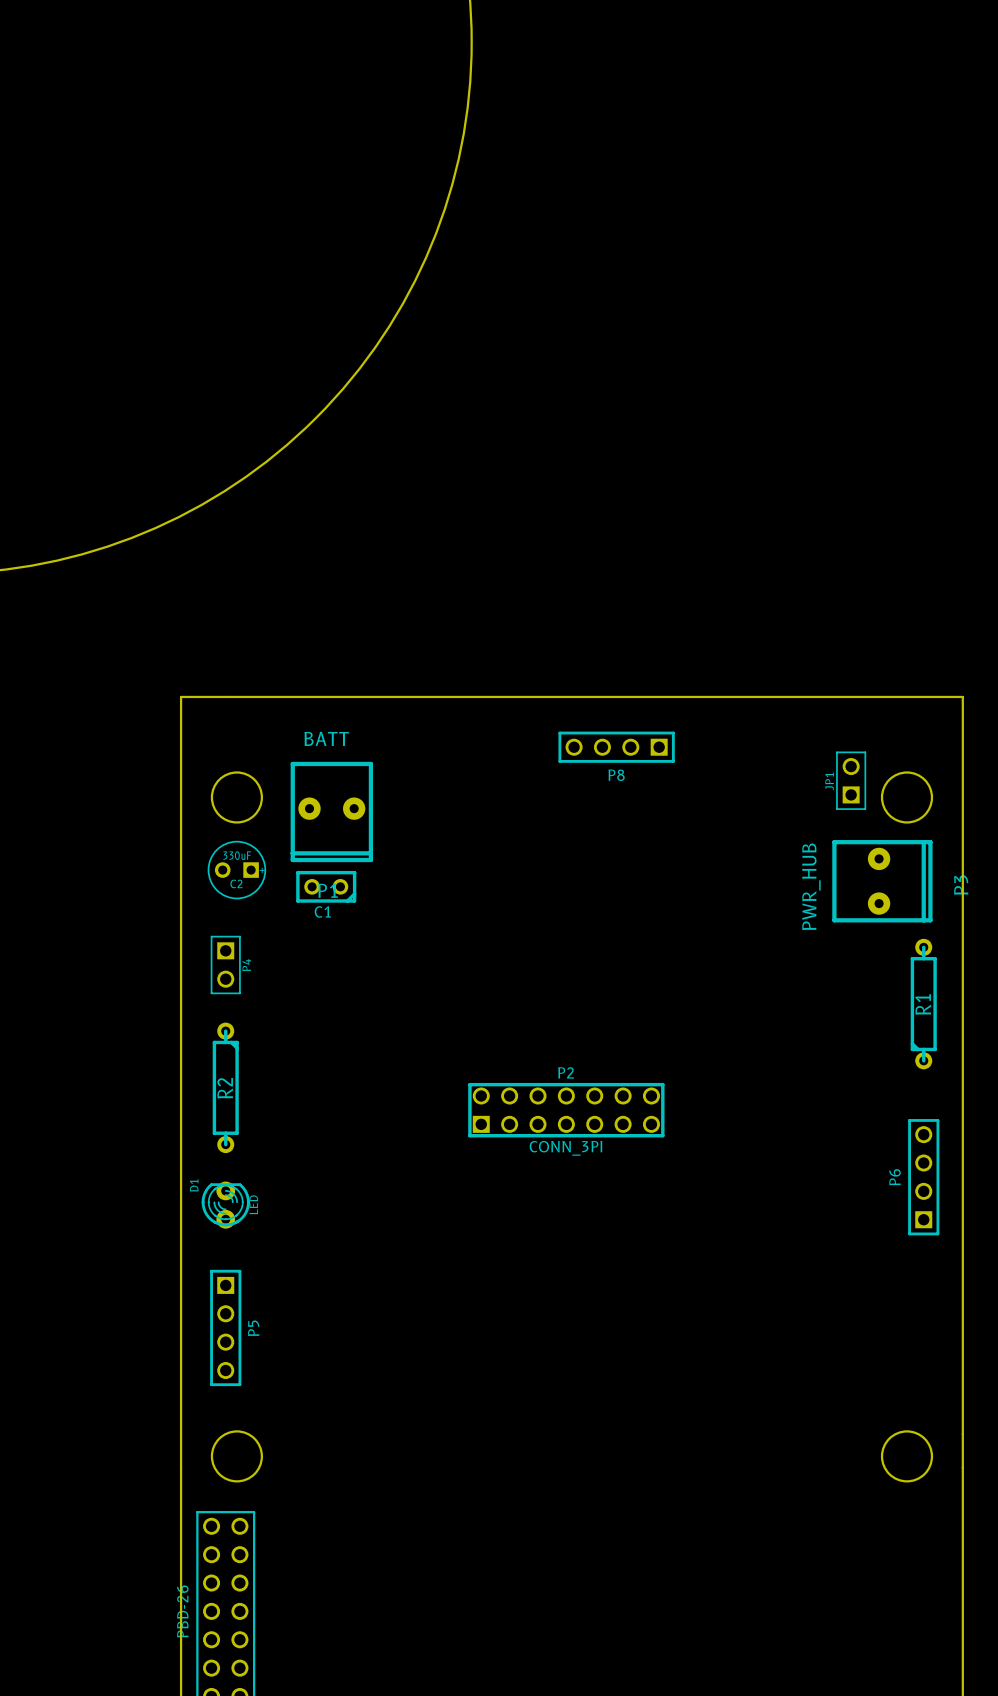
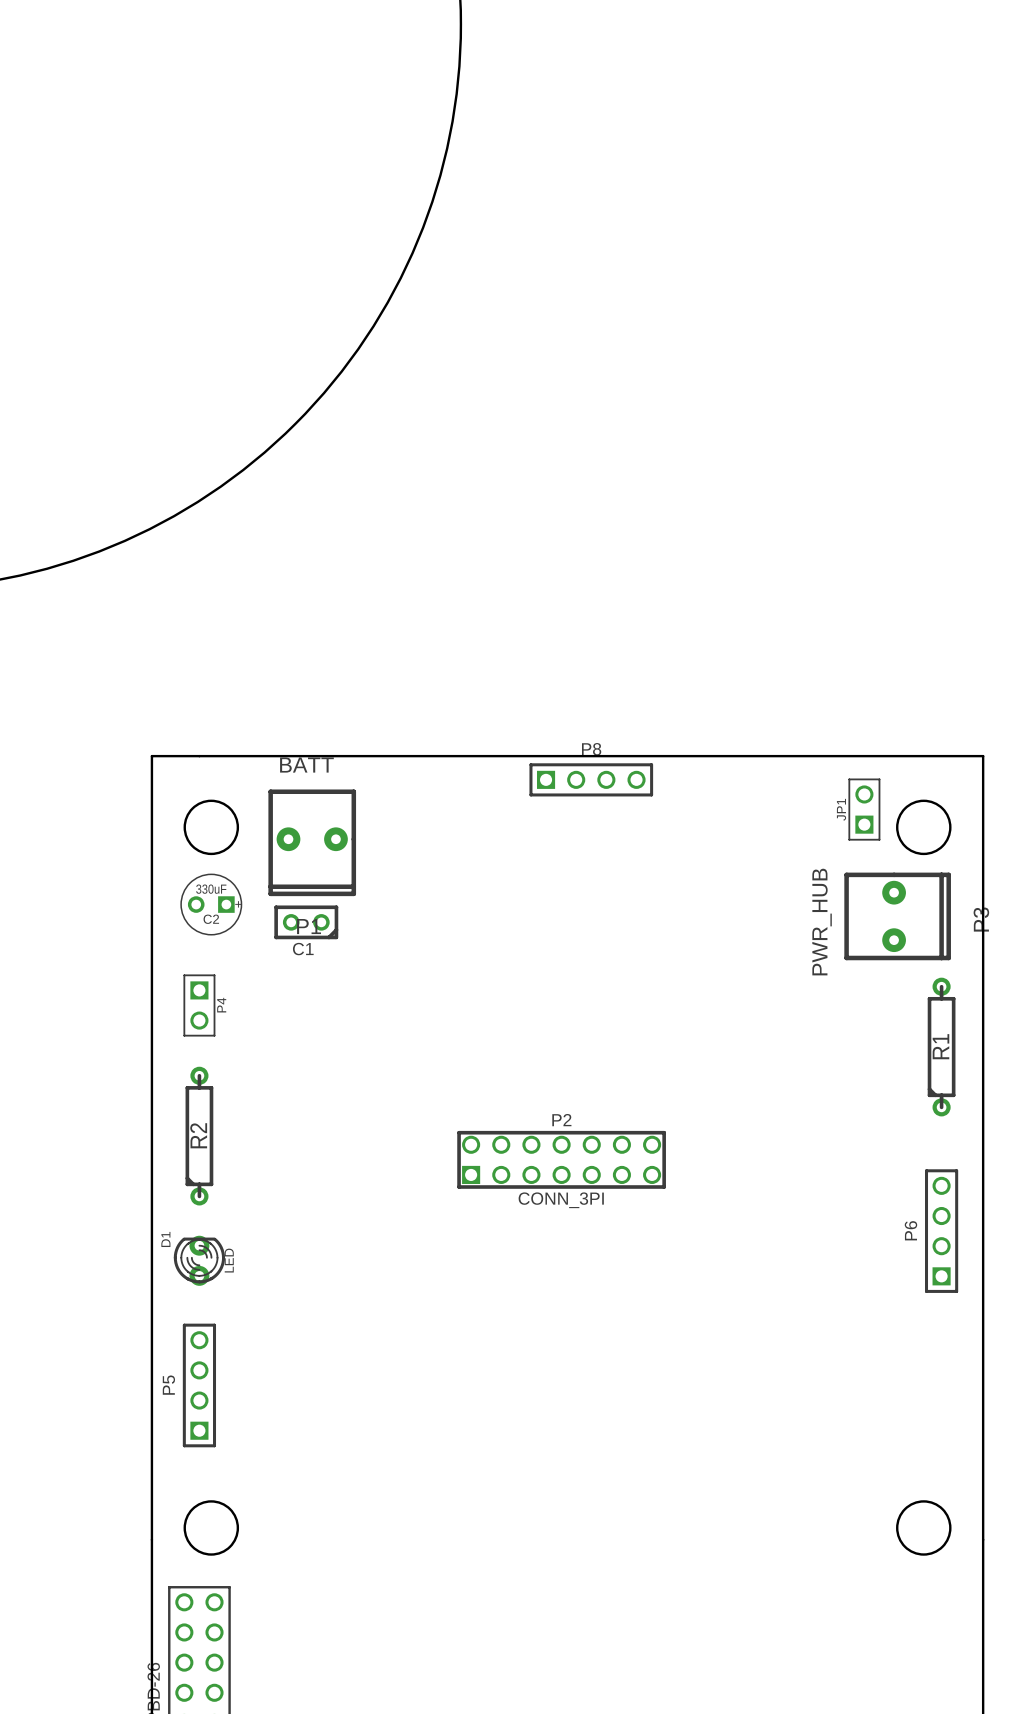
board edge: (181, 730) (181, 696) (962, 696) (962, 730) -> (151, 756) (983, 756)
P8 rotation: 0° (616, 747) -> 180° (591, 779)
R2 rotation: 0° (225, 1087) -> 180° (199, 1136)
P5 rotation: 0° (225, 1327) -> 180° (199, 1385)

